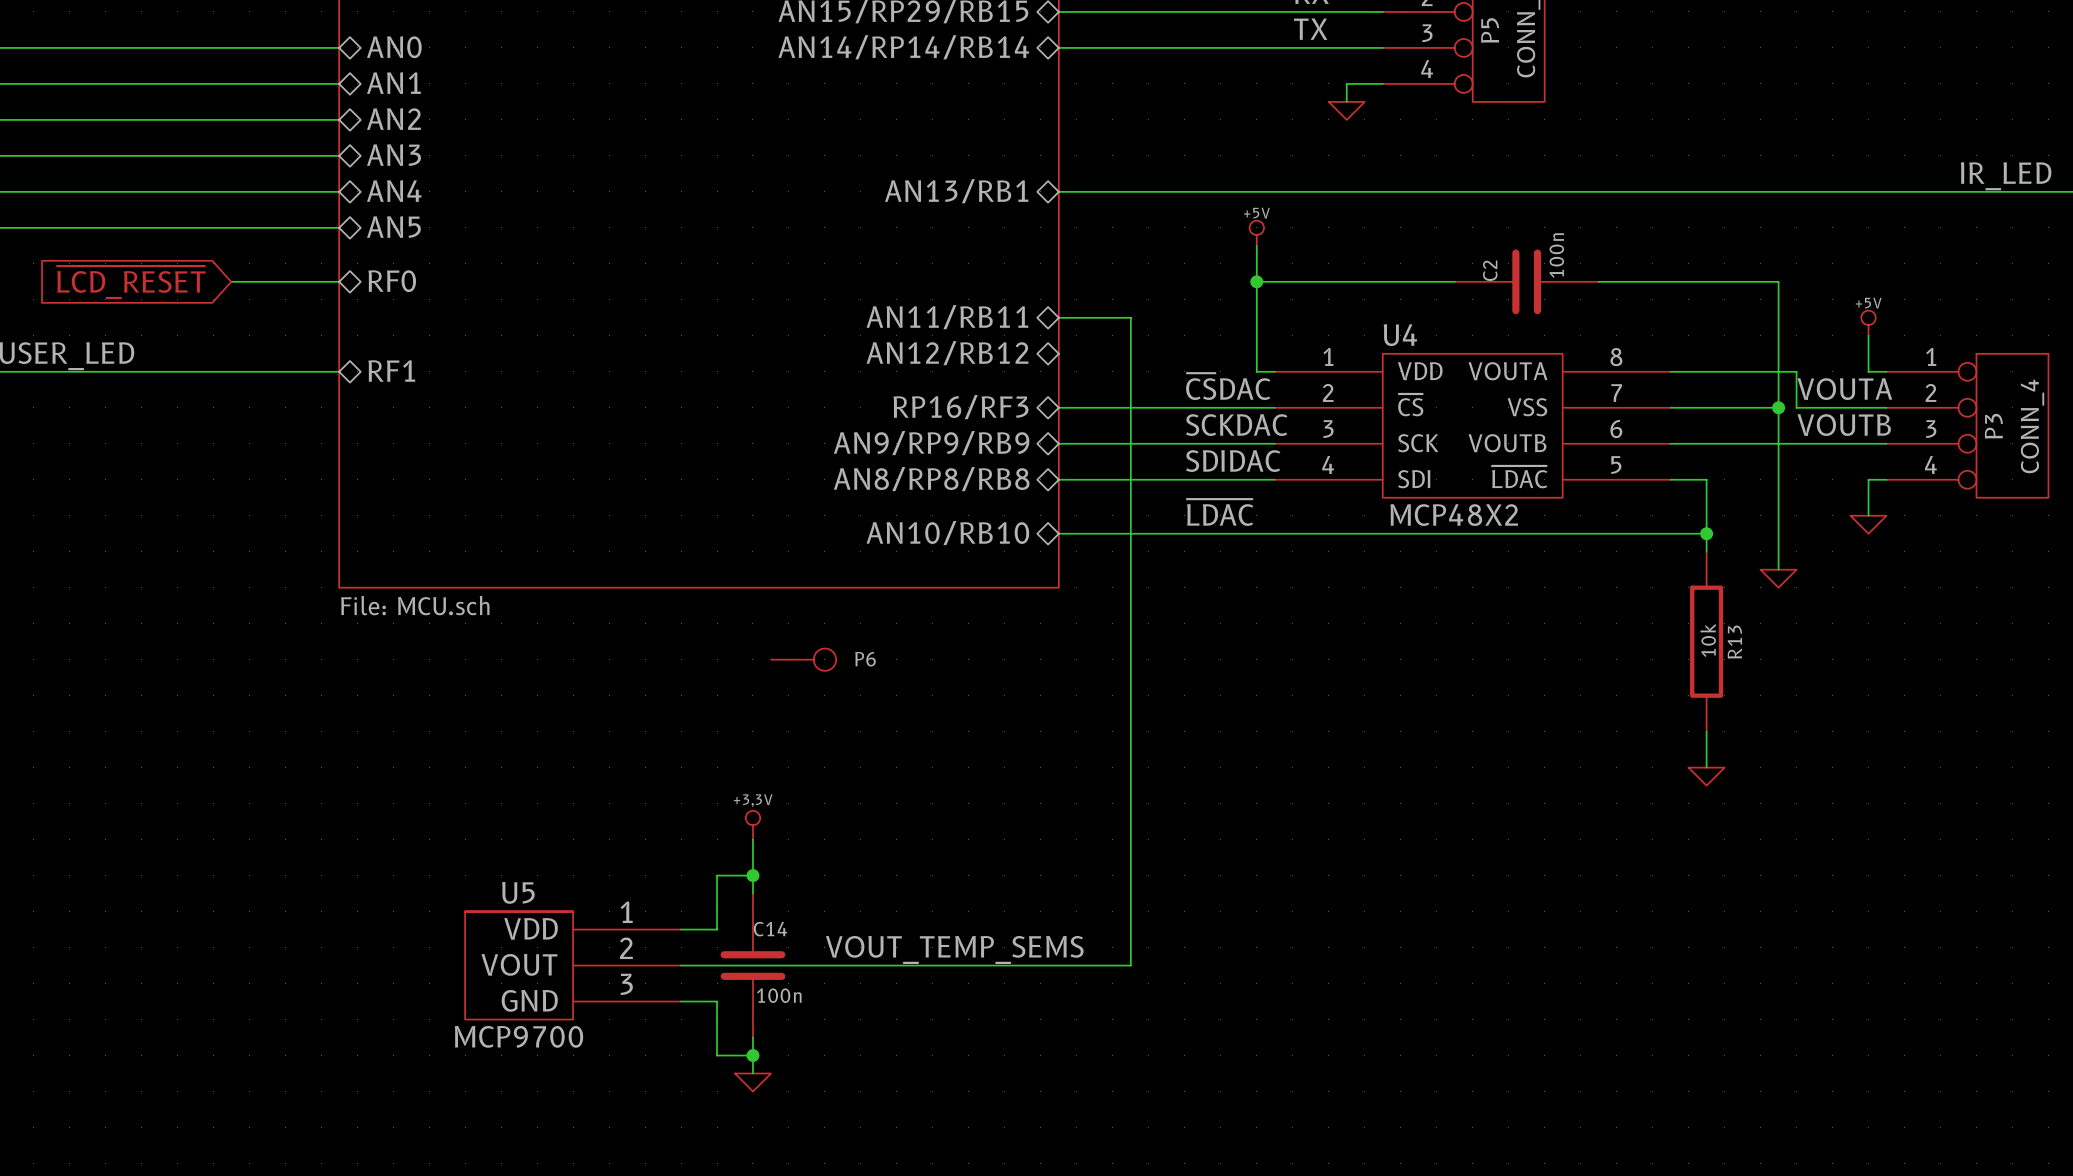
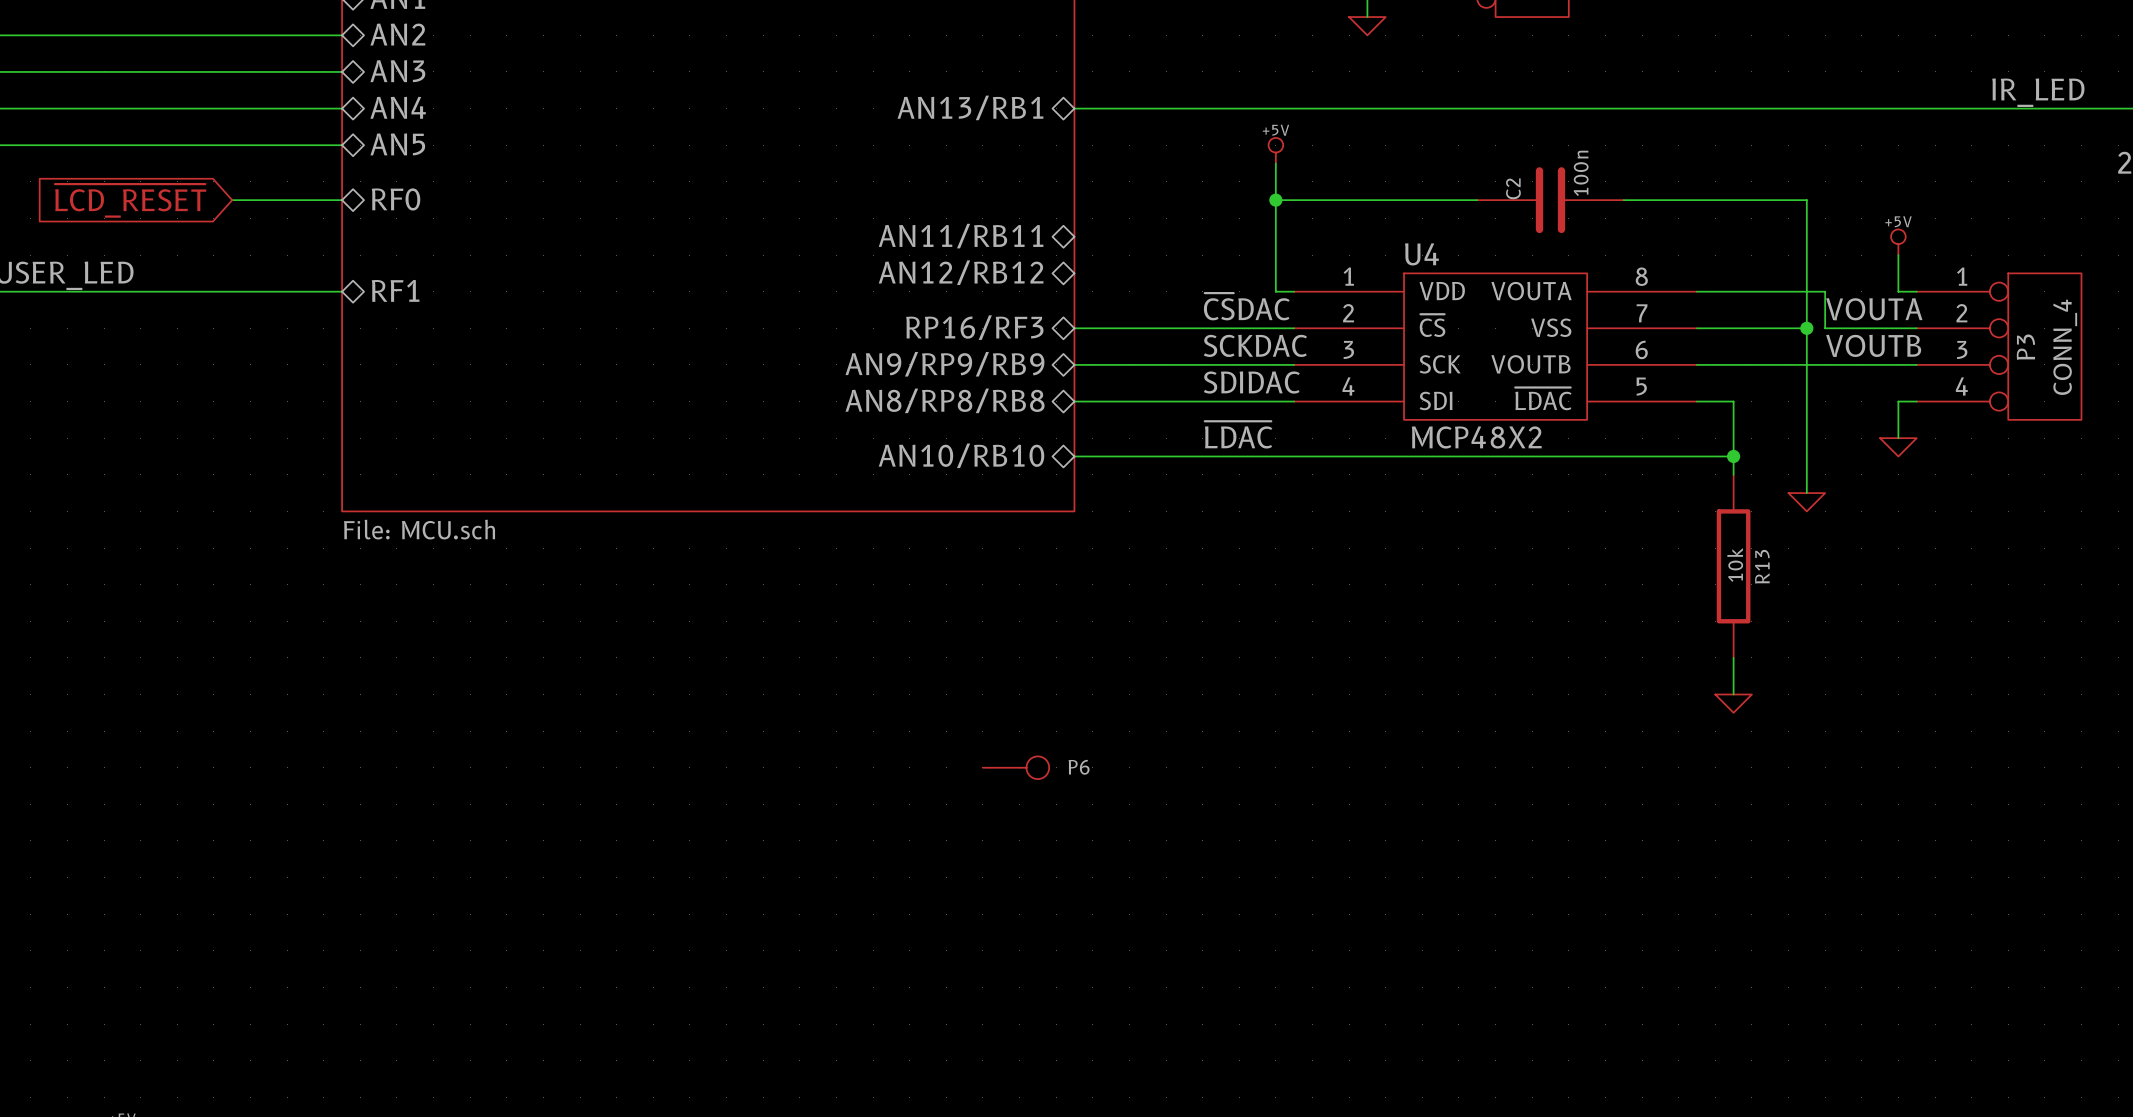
wire: (1058, 317) (1130, 317) (1130, 965) (681, 965) -> none
P6 position: (803, 659) -> (1016, 767)
power symbol: +3,3V (752, 825) -> none
wire: (752, 839) (752, 893) -> none
wire: (752, 875) (717, 875) (717, 929) (681, 929) -> none
junction: (752, 875) -> none
label: VOUT_TEMP_SEMS (954, 949) -> none
U5: MCP9700 (573, 965) -> none
C14: 100n (752, 965) -> none
wire: (681, 1001) (717, 1001) (717, 1055) (752, 1055) -> none
wire: (752, 1037) (752, 1073) -> none
junction: (752, 1055) -> none
power symbol: (752, 1082) -> none

